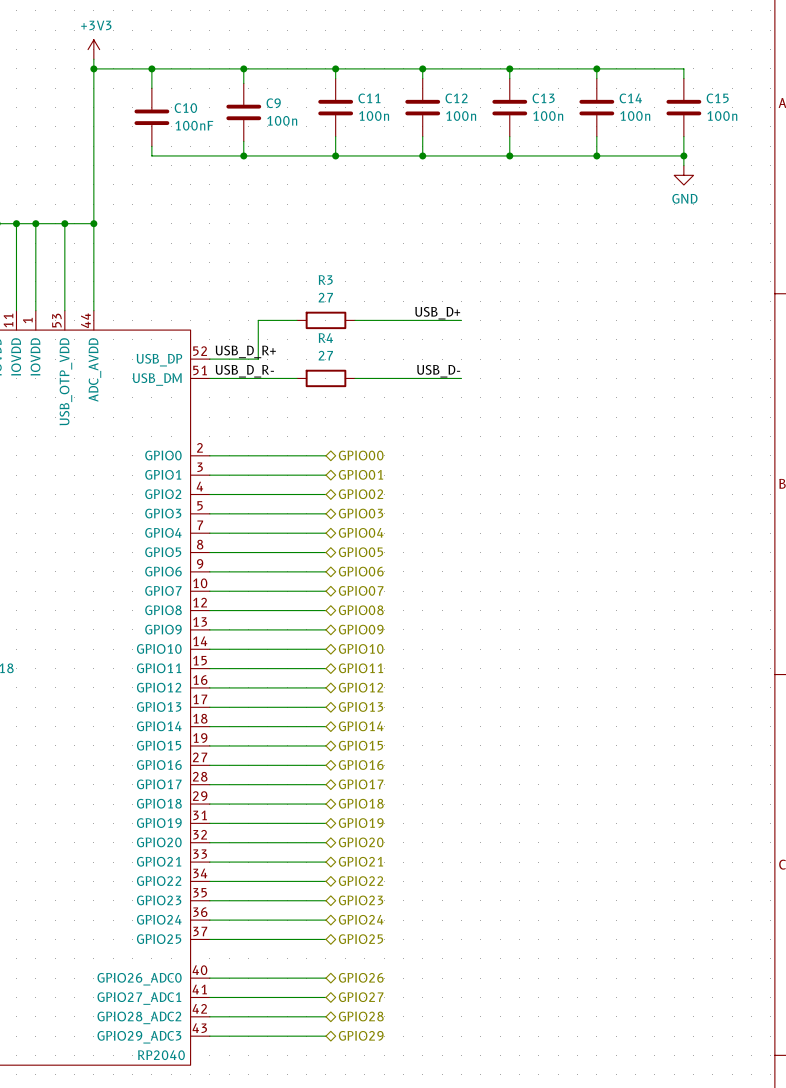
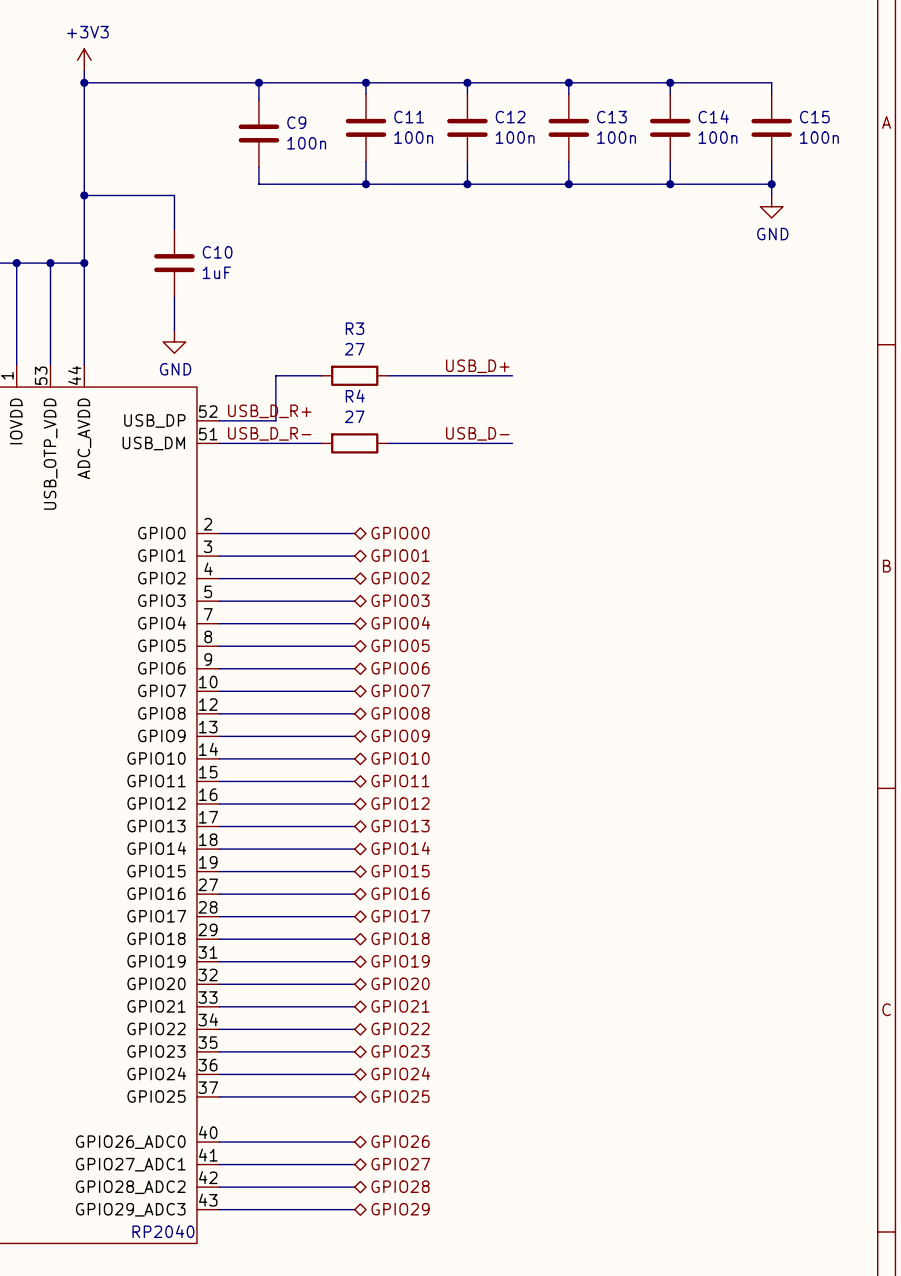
wire: (151, 68) (151, 88) -> none
junction: (151, 68) -> none
C10 position: (151, 117) -> (174, 263)
C10 value: 100nF (194, 125) -> 1uF (216, 272)
wire: (151, 146) (151, 155) (243, 155) -> none
junction: (243, 155) -> none
wire: none -> (84, 195) (174, 195) (174, 229)
junction: none -> (84, 195)
wire: none -> (174, 296) (174, 330)
power symbol: none -> GND (174, 341)

